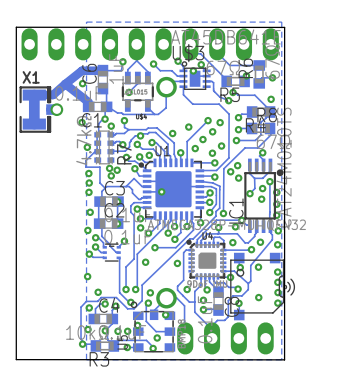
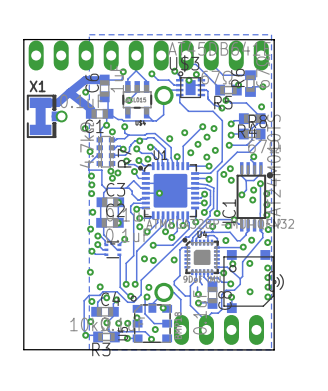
via: none -> (153, 260)
via: (187, 289) -> none
via: (207, 289) -> none
track: none -> (197, 286) (197, 291)

